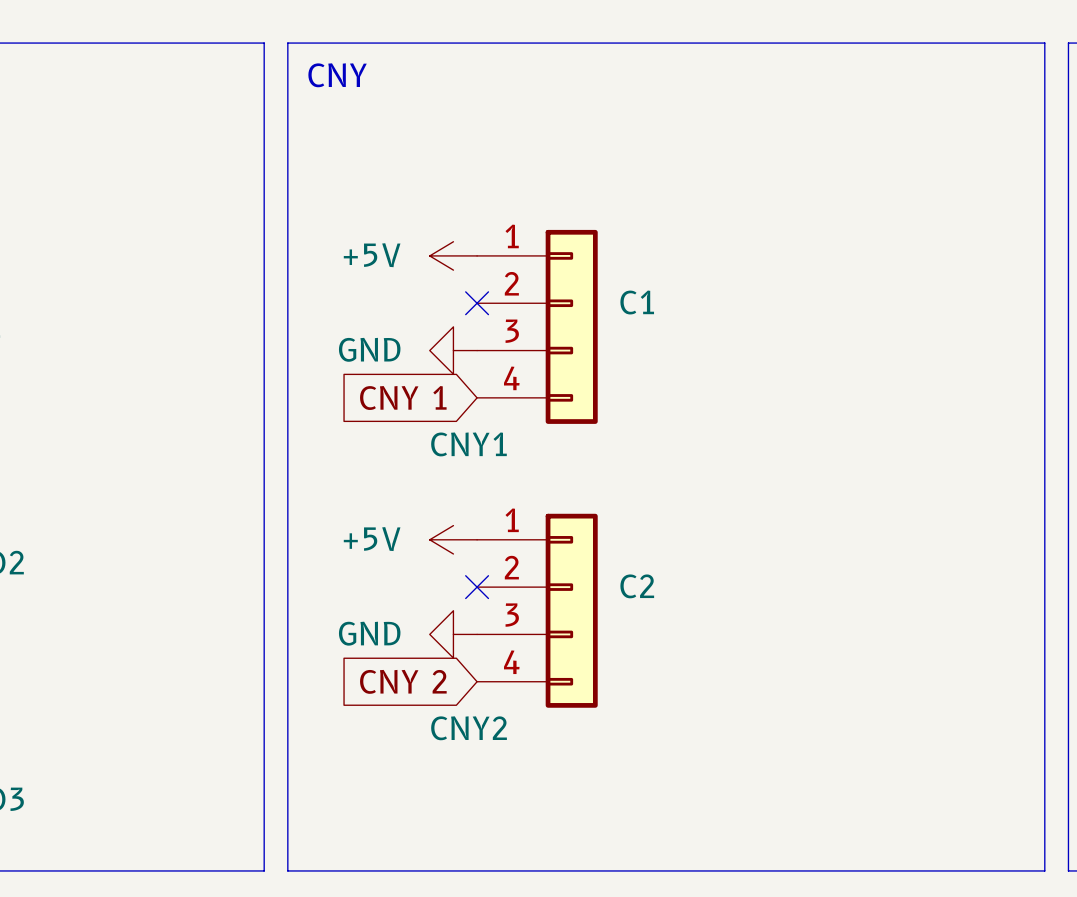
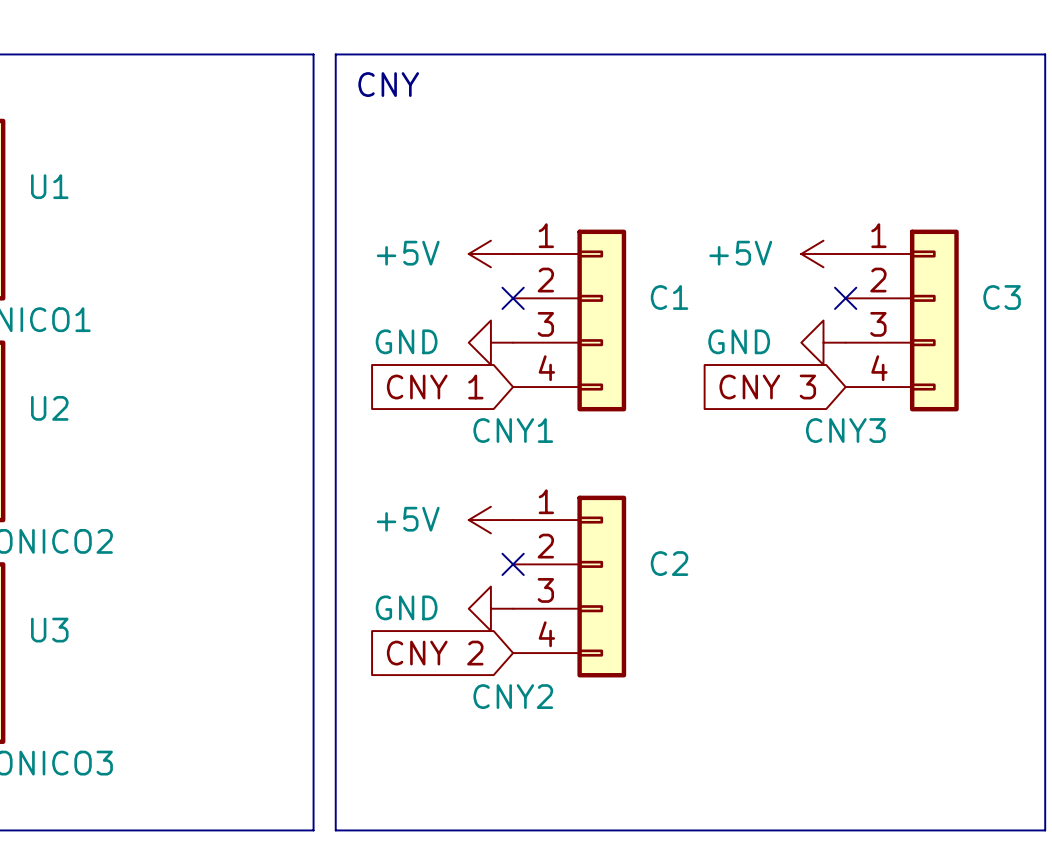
power symbol: none -> +5V (823, 253)
no-connect mark: none -> (845, 298)
C3: none -> CNY3 (902, 320)
power symbol: none -> GND (823, 342)
global label: none -> CNY 3 (767, 387)

